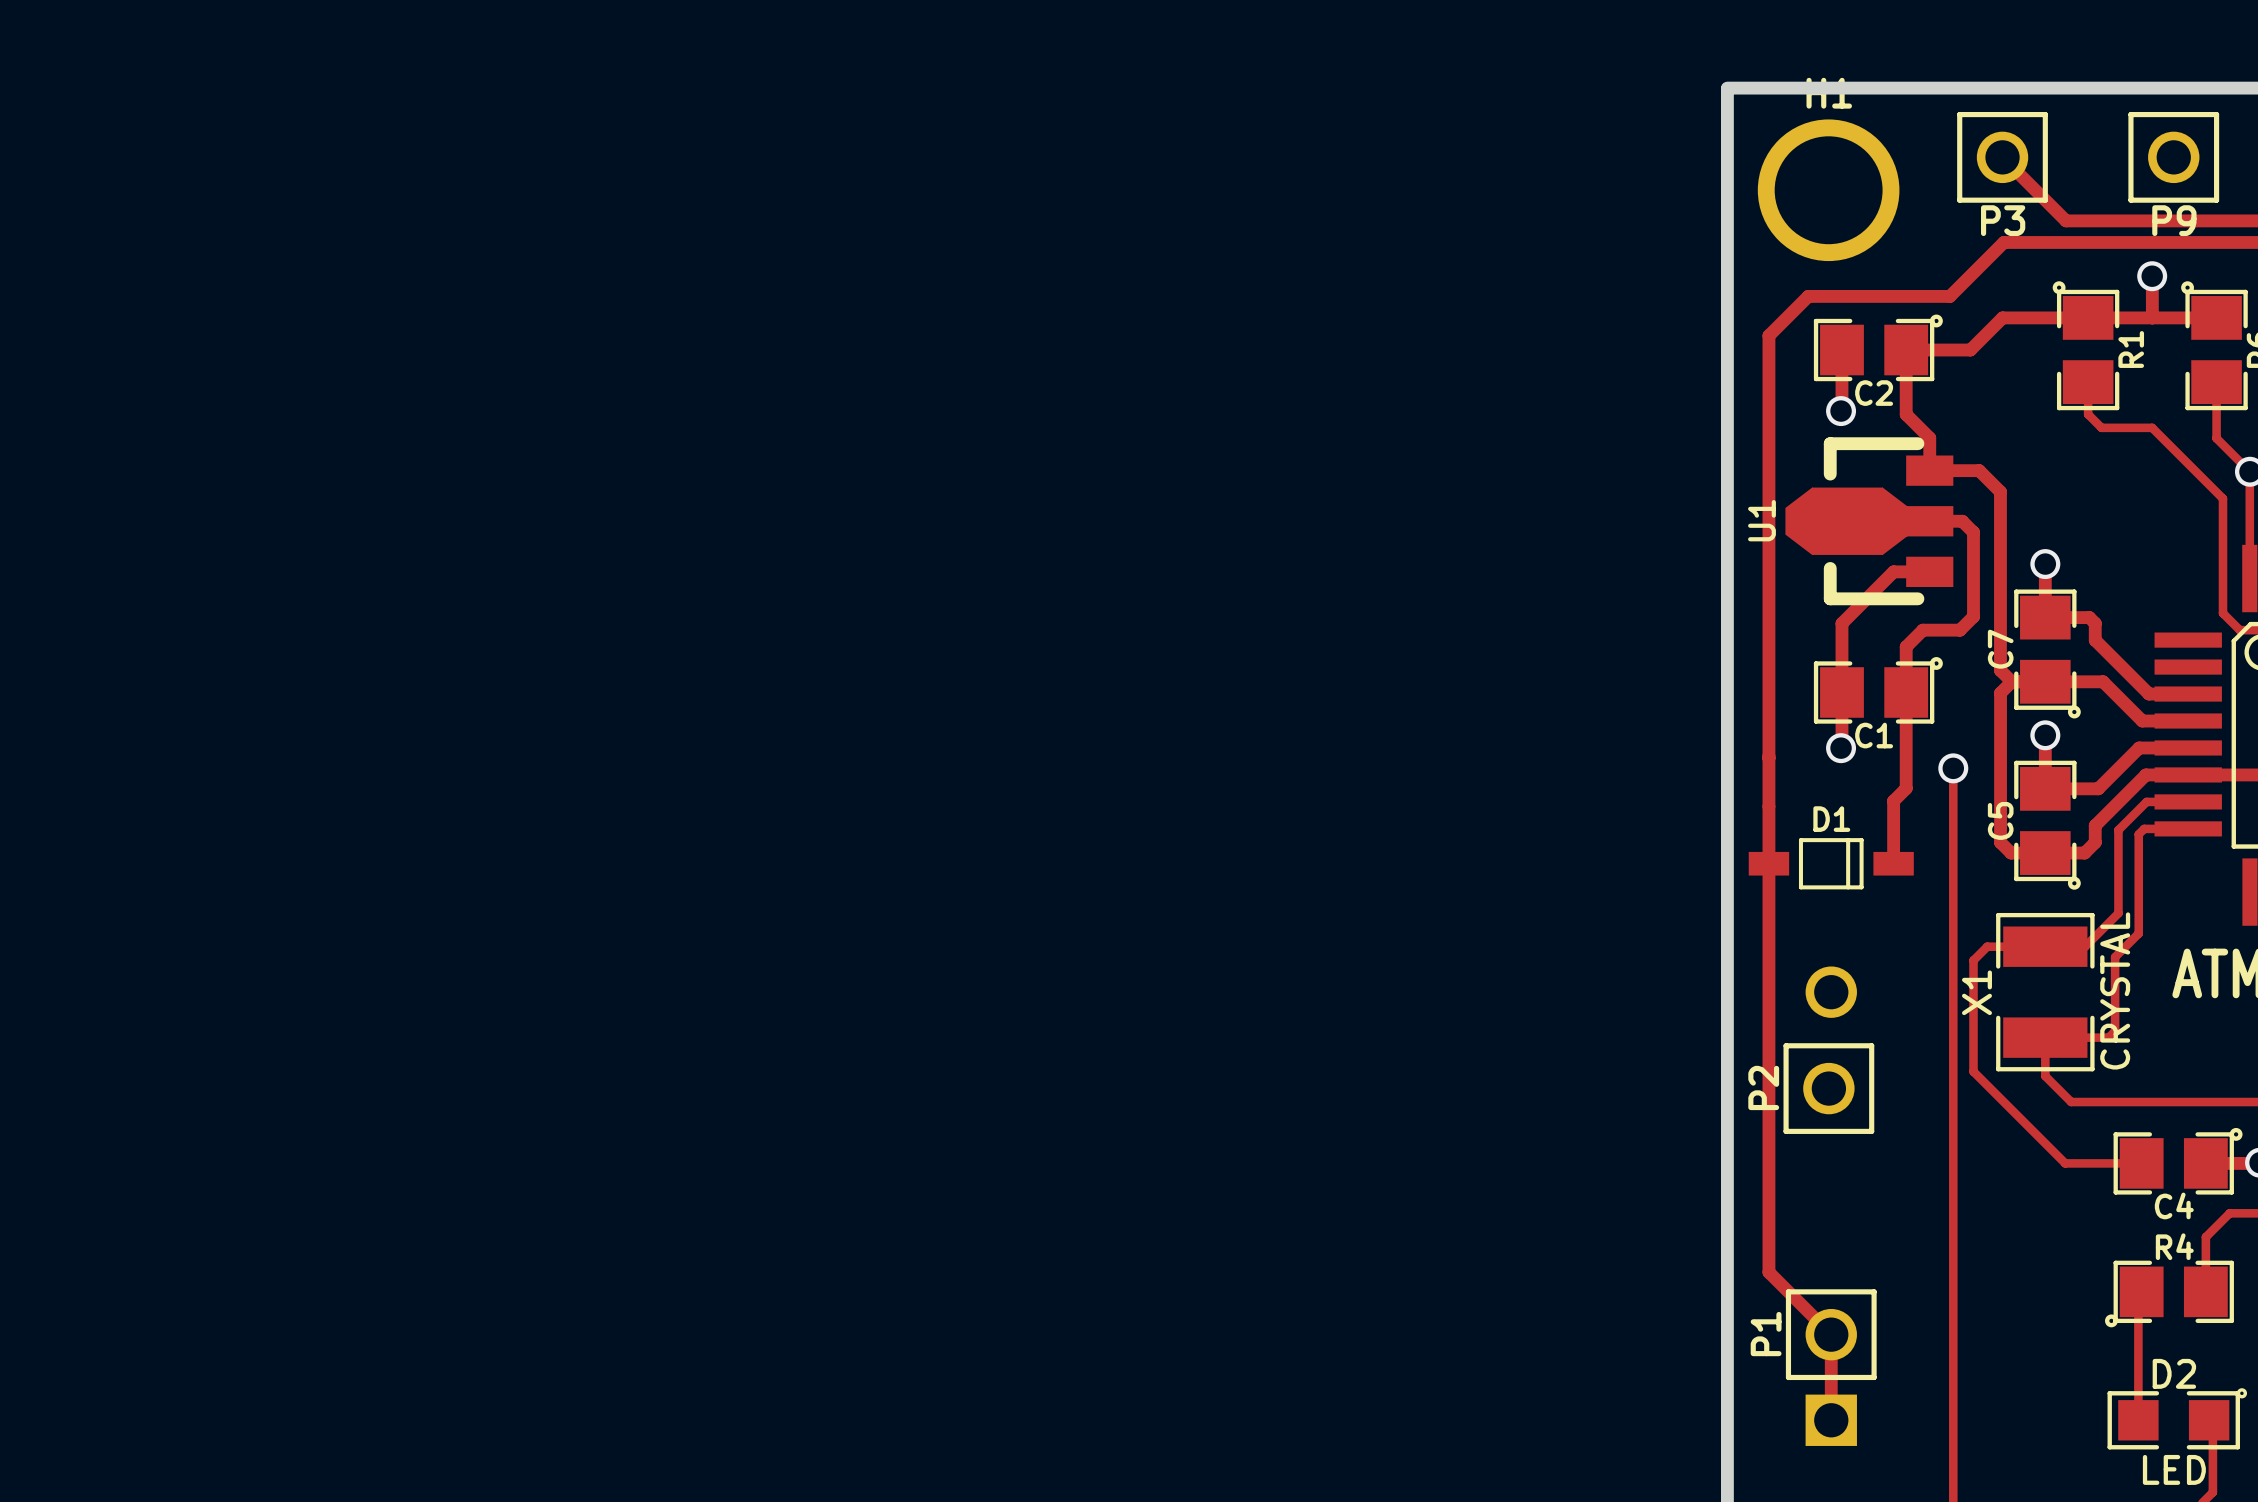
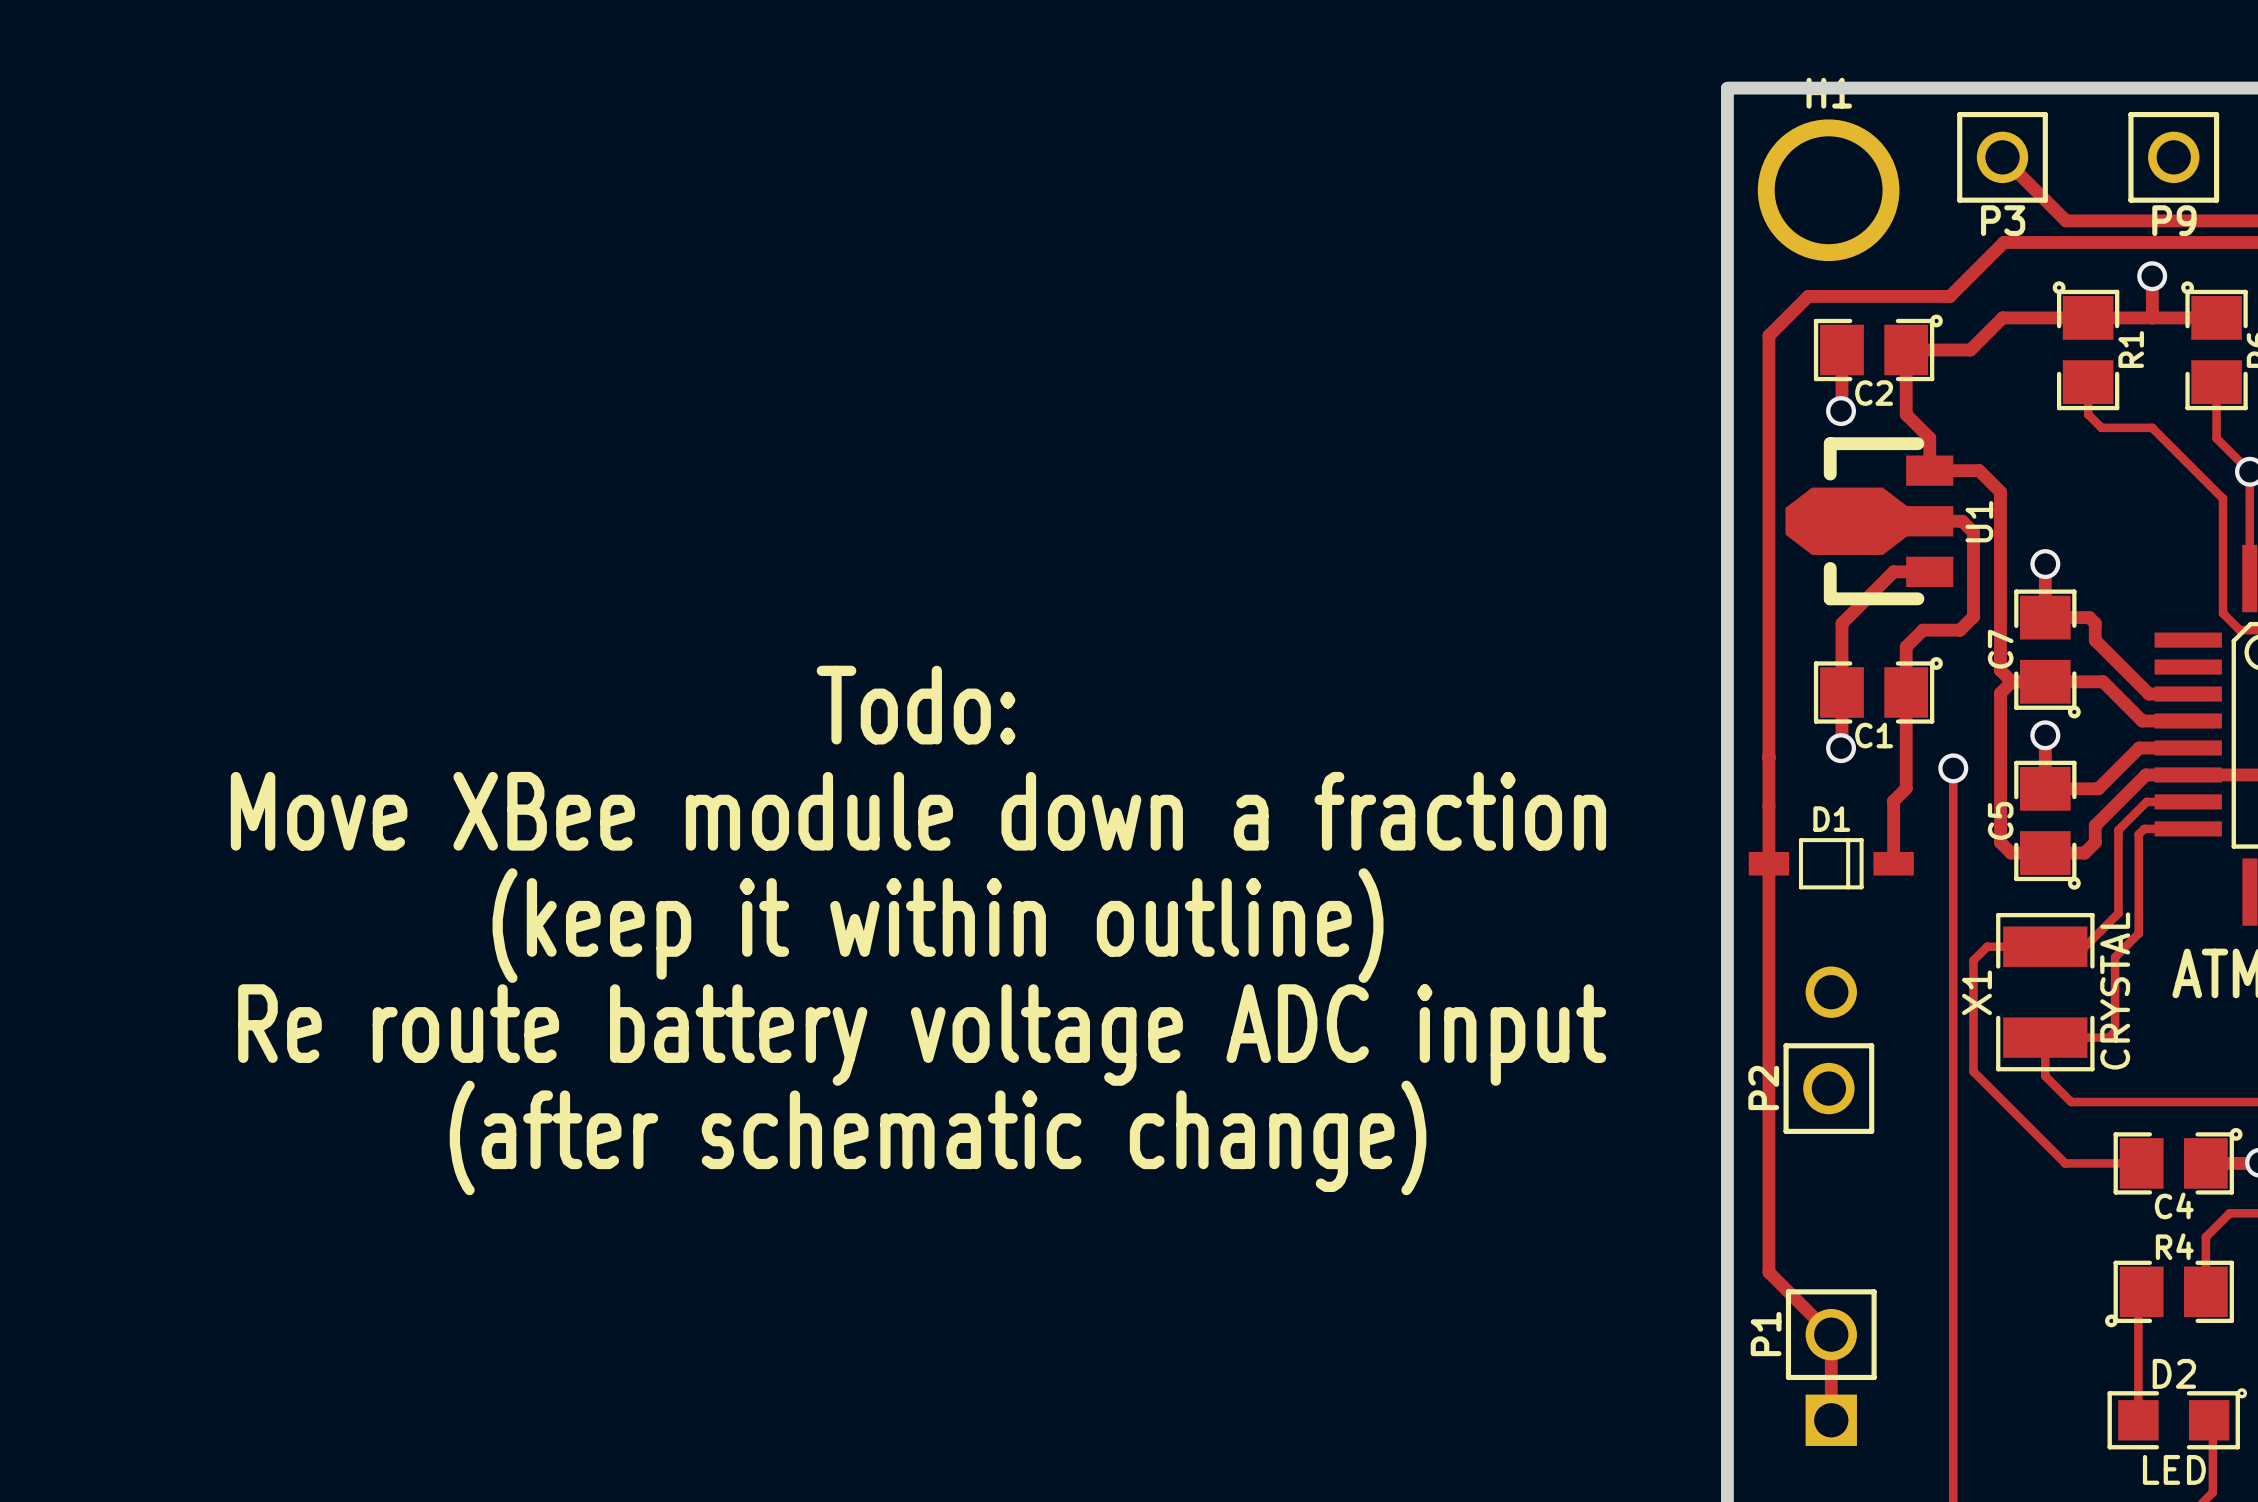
U1 name position: U1 (1761, 520) -> U1 (1979, 521)
text: none -> Todo: (916, 705)
text: none -> Move XBee module down a fraction (918, 811)
text: none -> (keep it within outline) (938, 925)
text: none -> Re route battery voltage ADC input (922, 1035)
text: none -> (after schematic change) (938, 1137)

